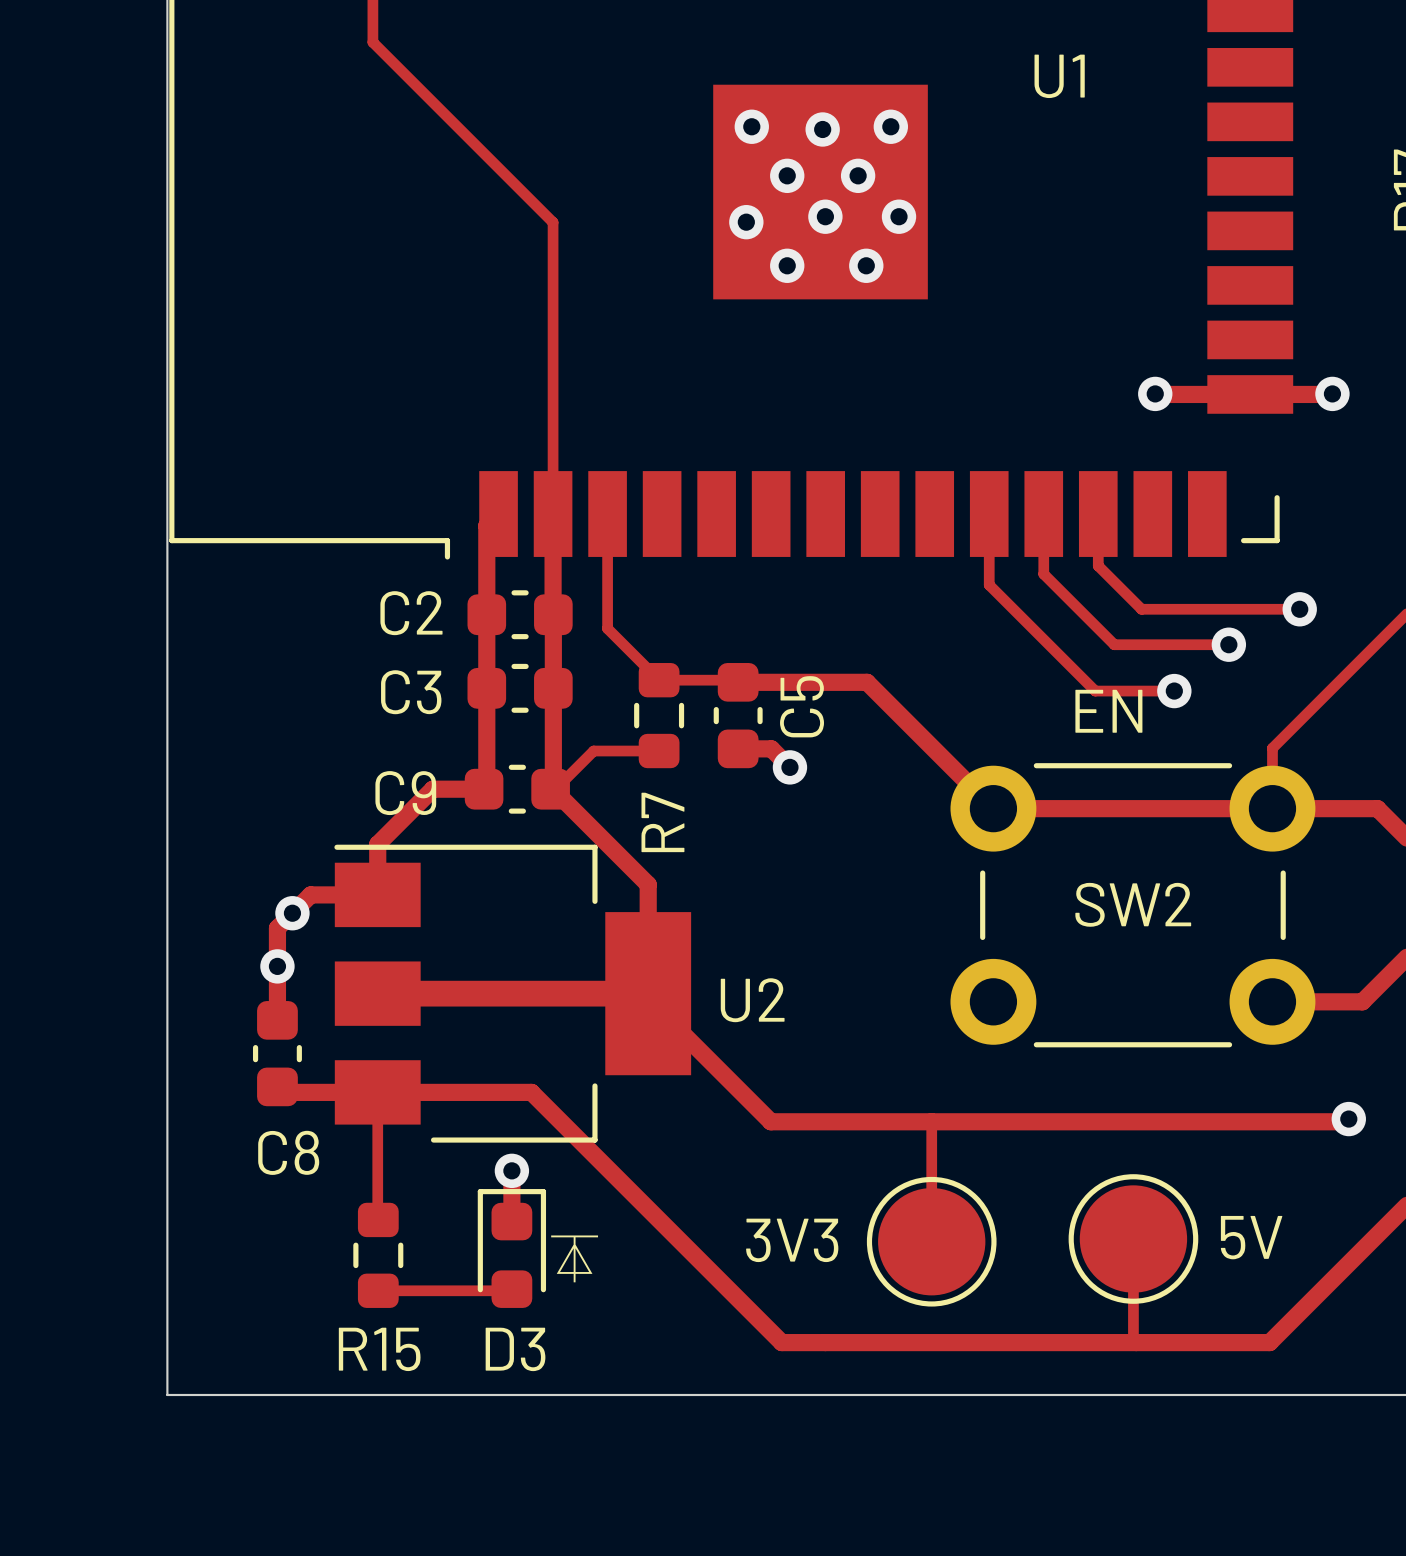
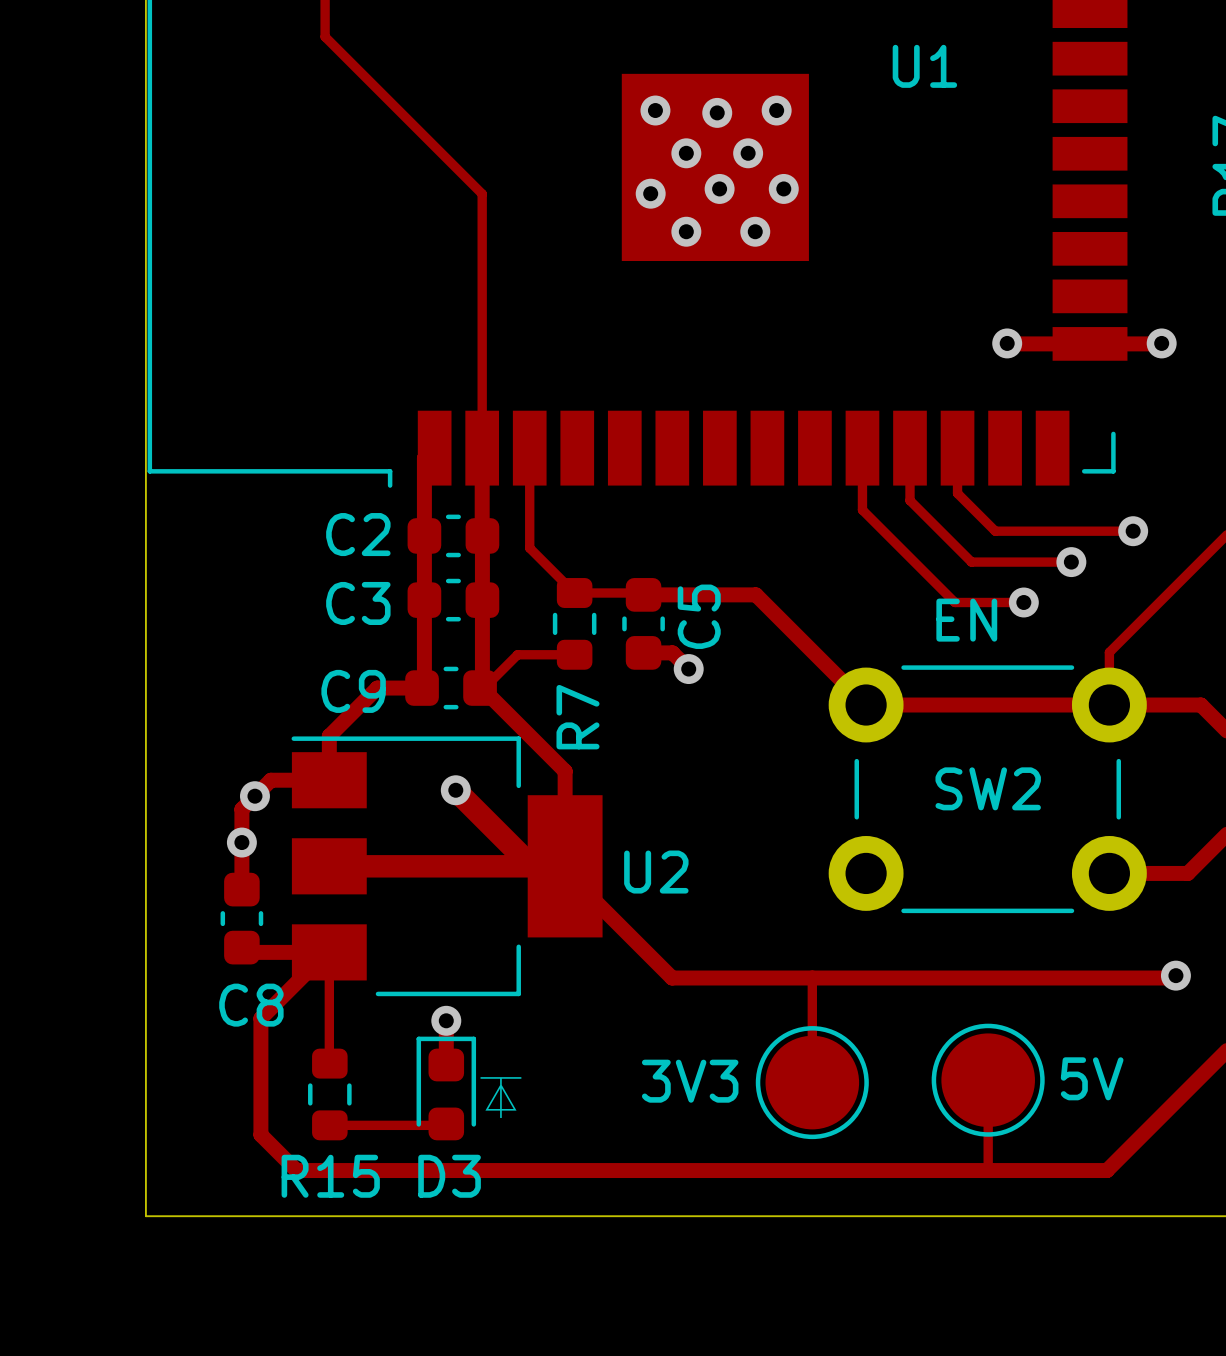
track: none -> (455, 790) (531, 866)
via: none -> (455, 790)
track: (377, 1092) (531, 1092) (781, 1342) -> (326, 952) (260, 1018) (260, 1134) (296, 1170) (681, 1170)

